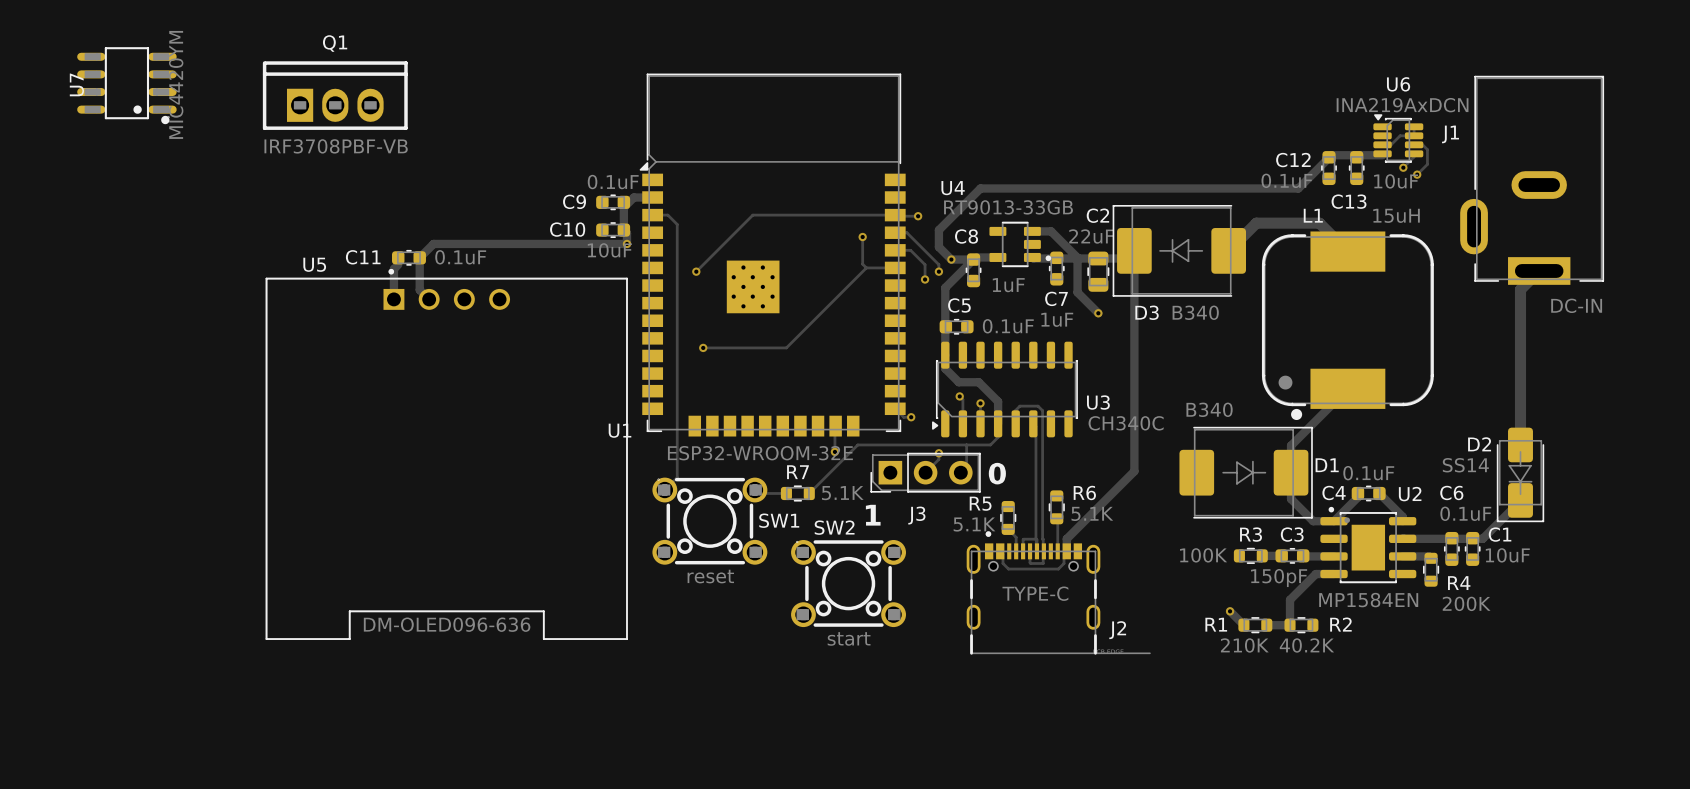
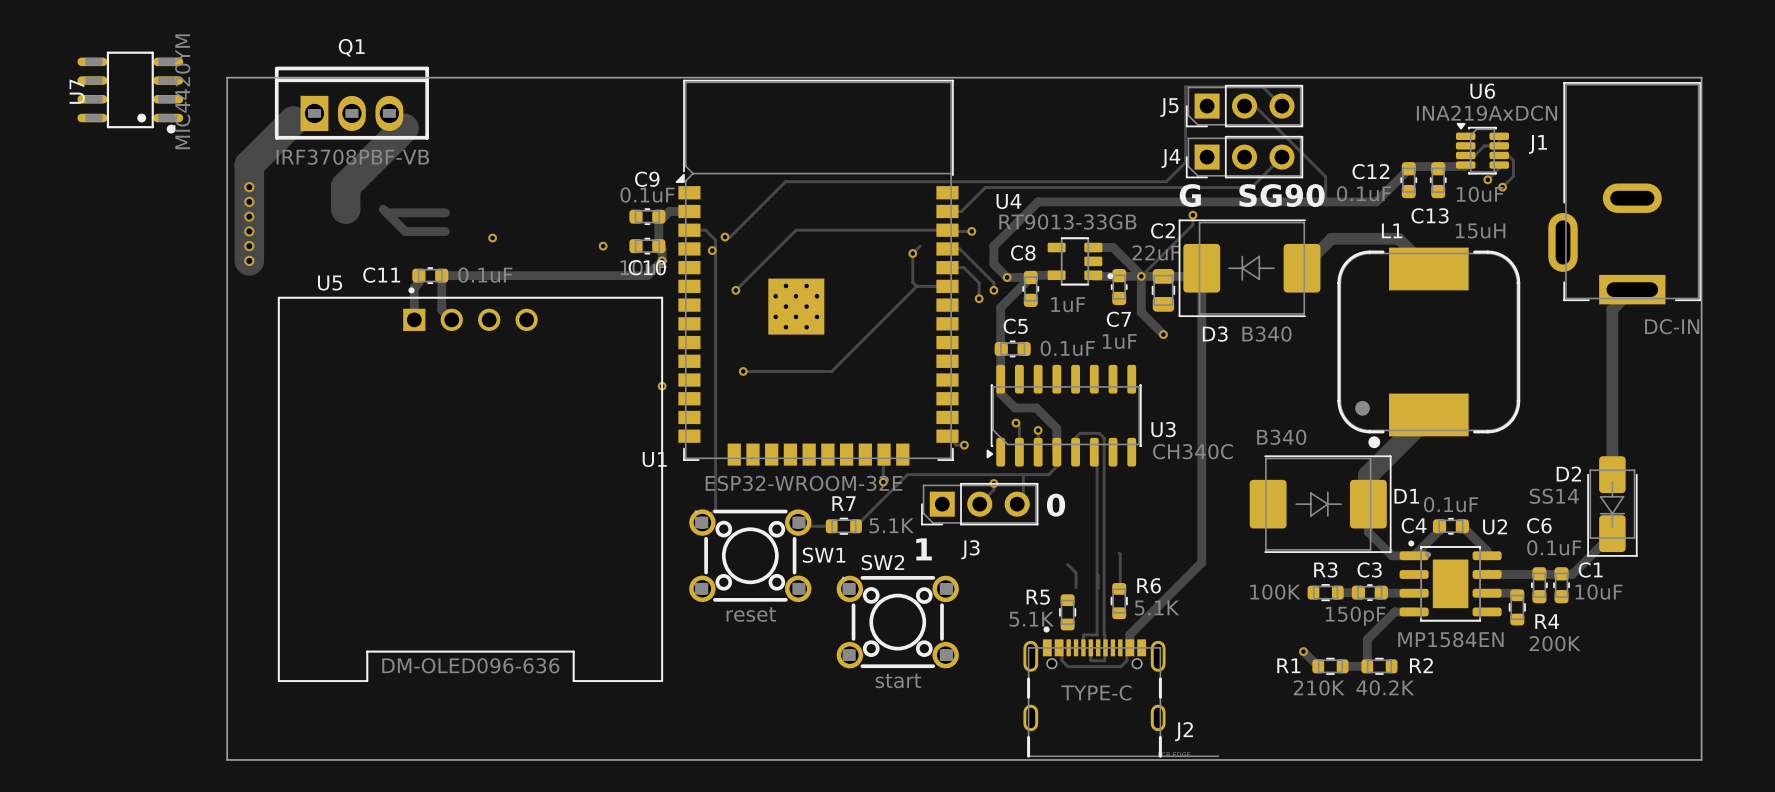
board edge: none -> (227, 77) (1701, 77) (1701, 759) (227, 759) (227, 77)
track: none -> (1244, 106) (1254, 106) (1325, 176) (1325, 201)
J5: none -> (1244, 106)
track: none -> (1281, 106) (1262, 86) (1185, 86) (1185, 162) (1166, 181) (785, 181) (730, 237) (725, 237)
track: none -> (293, 120) (249, 165) (249, 260)
track: none -> (404, 128) (345, 186) (345, 209)
J4: none -> (1244, 157)
track: none -> (1281, 157) (1251, 187) (985, 187) (961, 211) (947, 211)
via: none -> (249, 187)
text: none -> G (1190, 195)
text: none -> SG90 (1282, 195)
via: none -> (249, 201)
track: none -> (445, 212) (386, 212) (383, 209) (405, 231) (445, 231)
track: none -> (1192, 215) (1192, 224) (1141, 276)
via: none -> (1192, 215)
C9 name position: C9 (574, 201) -> C9 (647, 179)
via: none -> (249, 216)
via: none -> (249, 231)
via: none -> (725, 237)
via: none -> (492, 238)
C10 name position: C10 (567, 229) -> C10 (647, 267)
via: none -> (249, 246)
via: none -> (603, 246)
track: none -> (920, 246) (912, 253)
via: none -> (712, 250)
via: none -> (249, 260)
track: (626, 243) (433, 243) (419, 257) -> (662, 260) (647, 275) (441, 275)
via: none -> (1141, 276)
via: none -> (662, 386)
track width: thin (1347, 388) (1291, 445) (1291, 472) -> thick (1428, 414) (1368, 475) (1368, 504)
track: (1134, 471) (1066, 538) (1064, 563) (1058, 569) (1008, 569) (1002, 563) (1002, 554) (1000, 551) -> (1201, 502) (1201, 562) (1129, 634) (1126, 660) (1121, 666) (1067, 666) (1062, 660) (1062, 650) (1059, 647)
R6 position: (1056, 507) -> (1119, 601)
R5 position: (1008, 517) -> (1067, 612)
track: (1036, 539) (1023, 539) (1023, 551) -> (1097, 574) (1097, 634)
track: (1042, 539) (1043, 563) (1030, 563) (1030, 551) -> (1104, 574) (1104, 660) (1091, 660) (1090, 647)
J2 position: (1058, 593) -> (1121, 692)
track: none -> (1097, 634) (1084, 634) (1083, 647)

